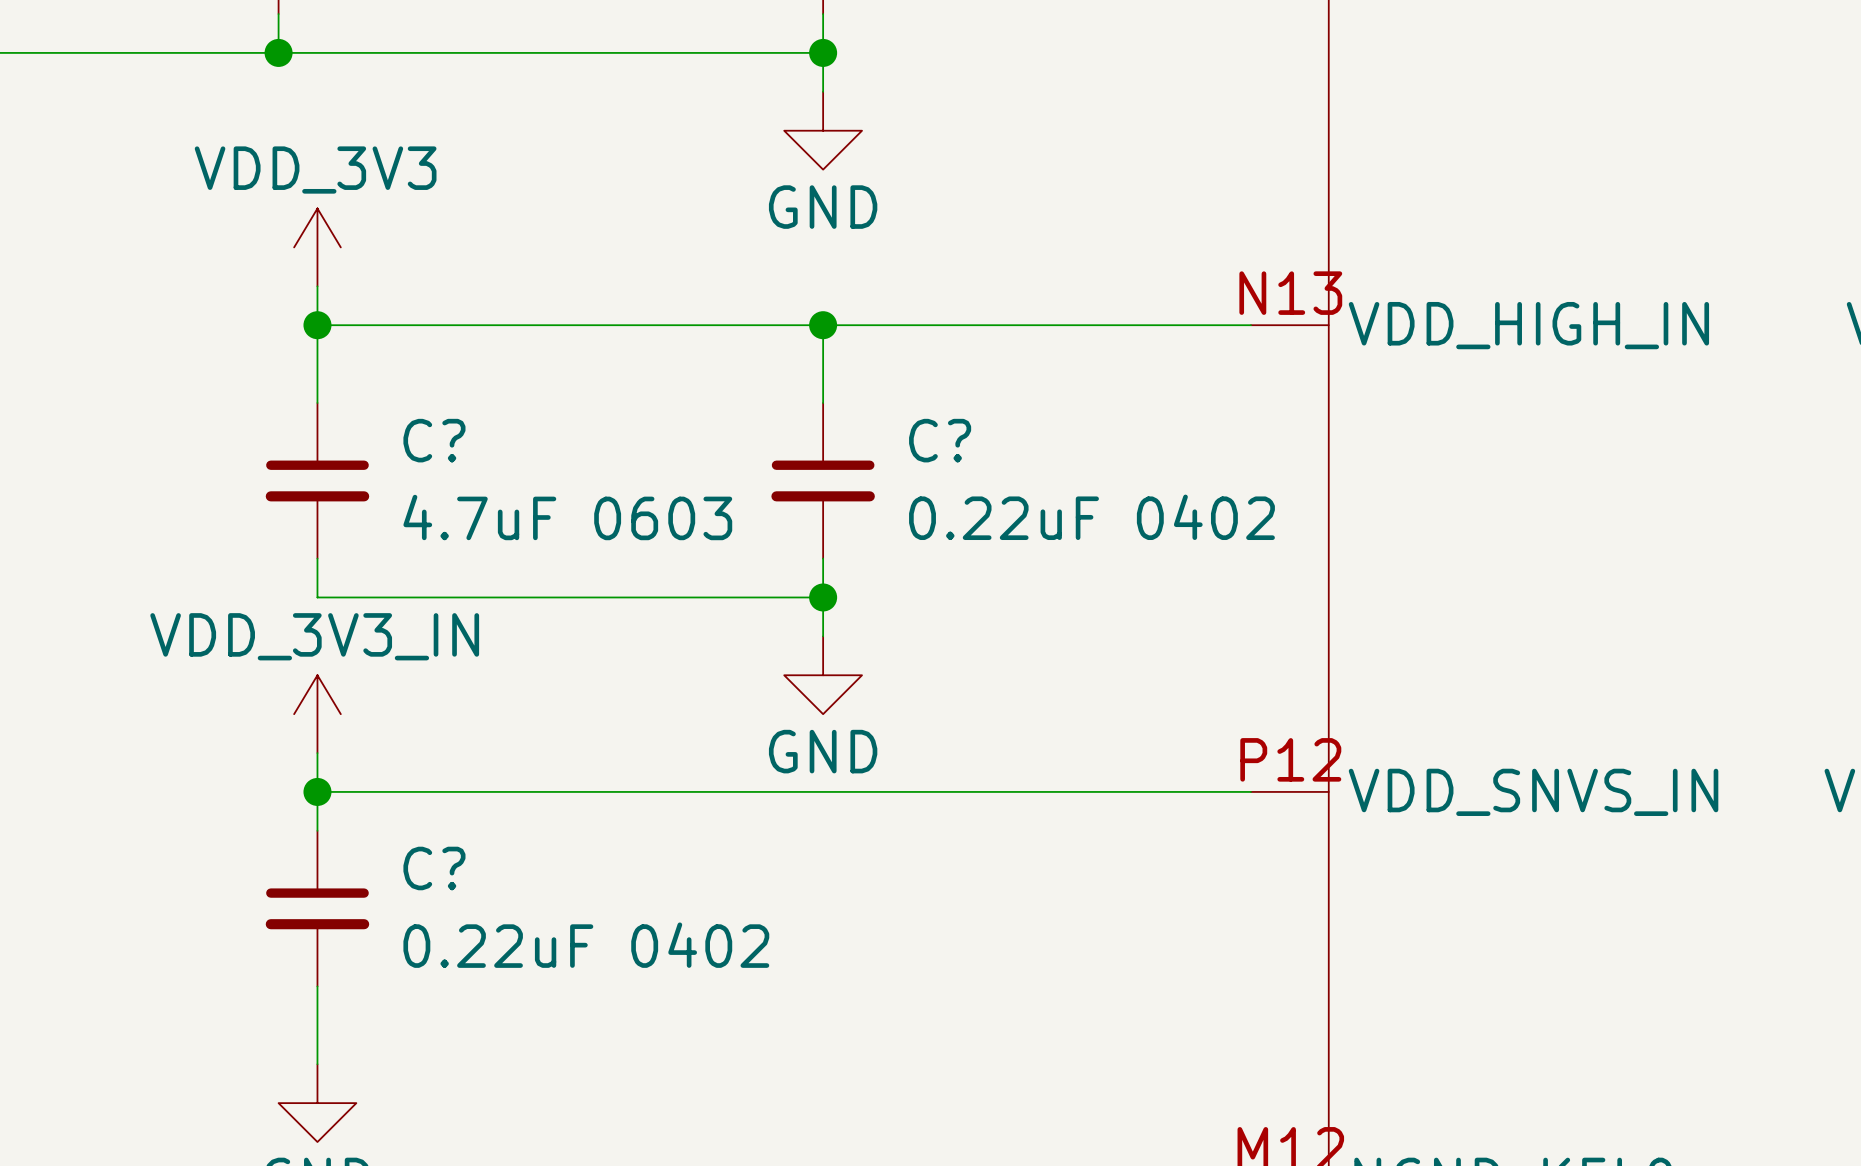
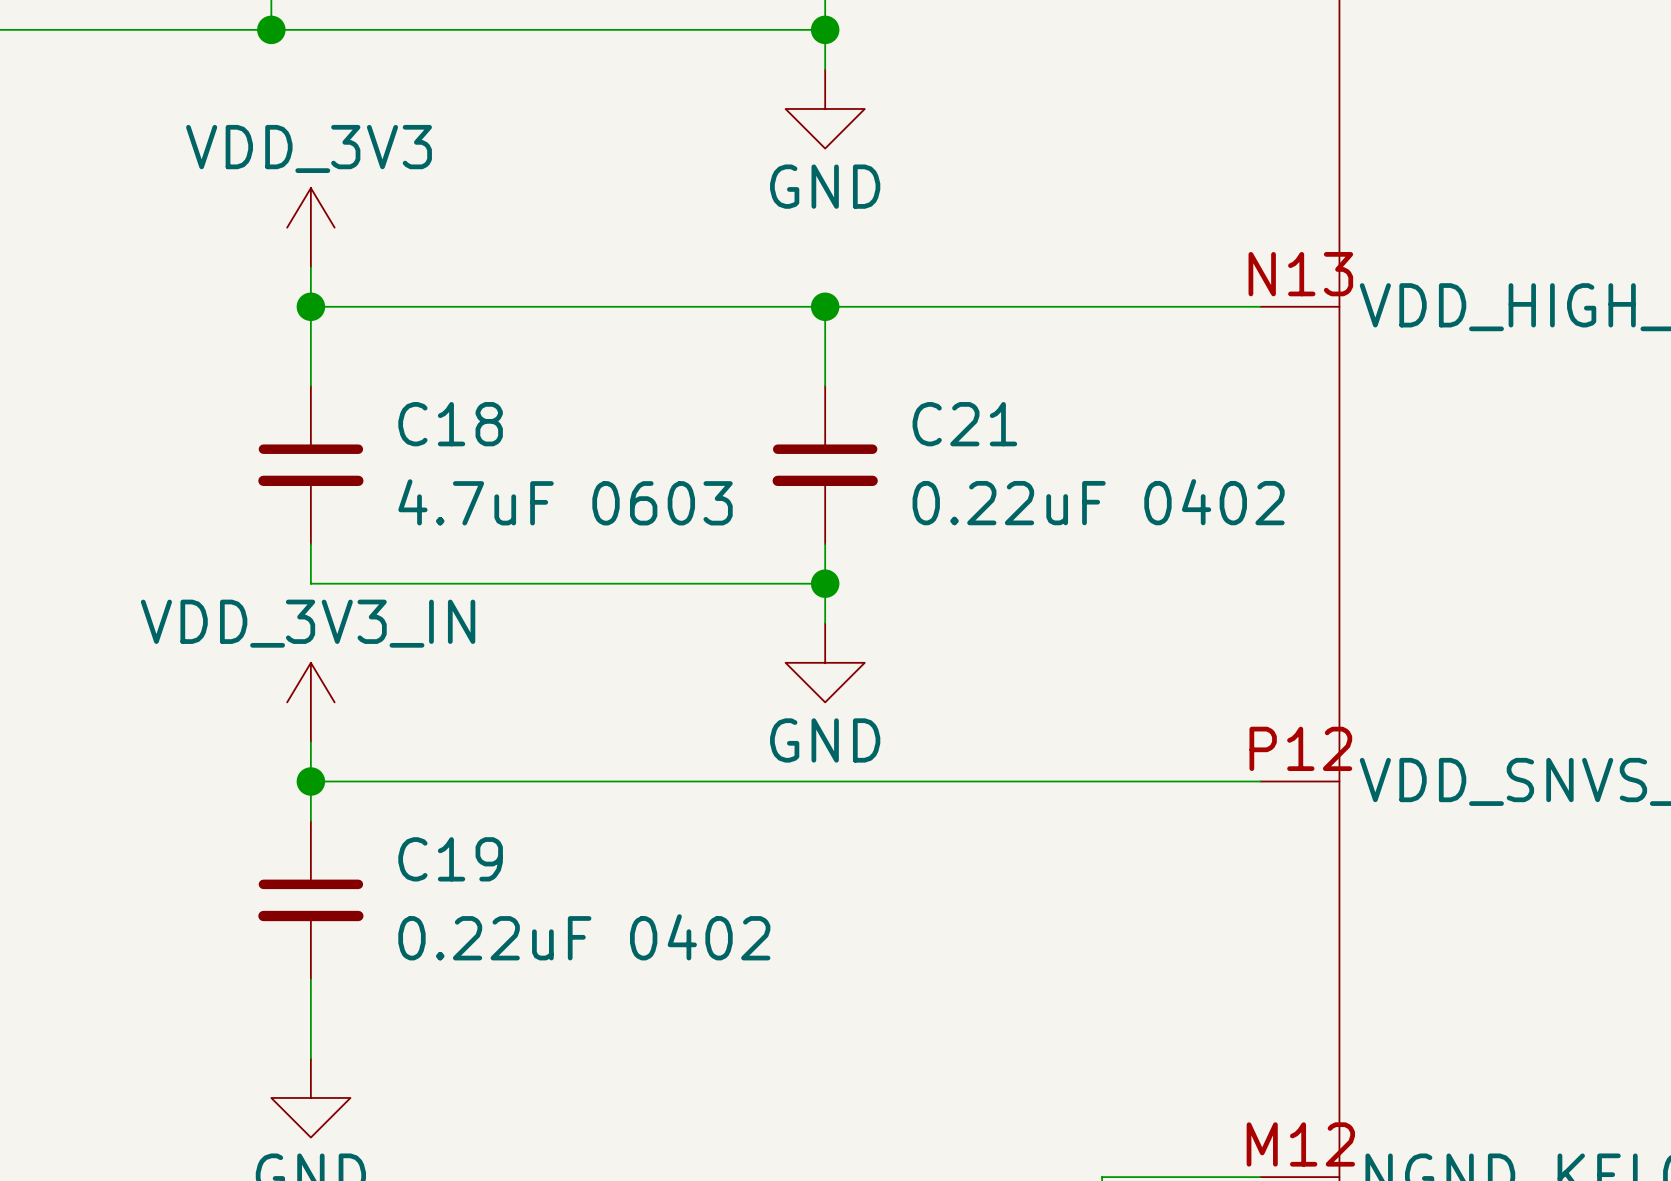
C? name: C? (434, 440) -> C18 (450, 424)
C? name: C? (940, 440) -> C21 (964, 424)
C? name: C? (434, 868) -> C19 (450, 859)

